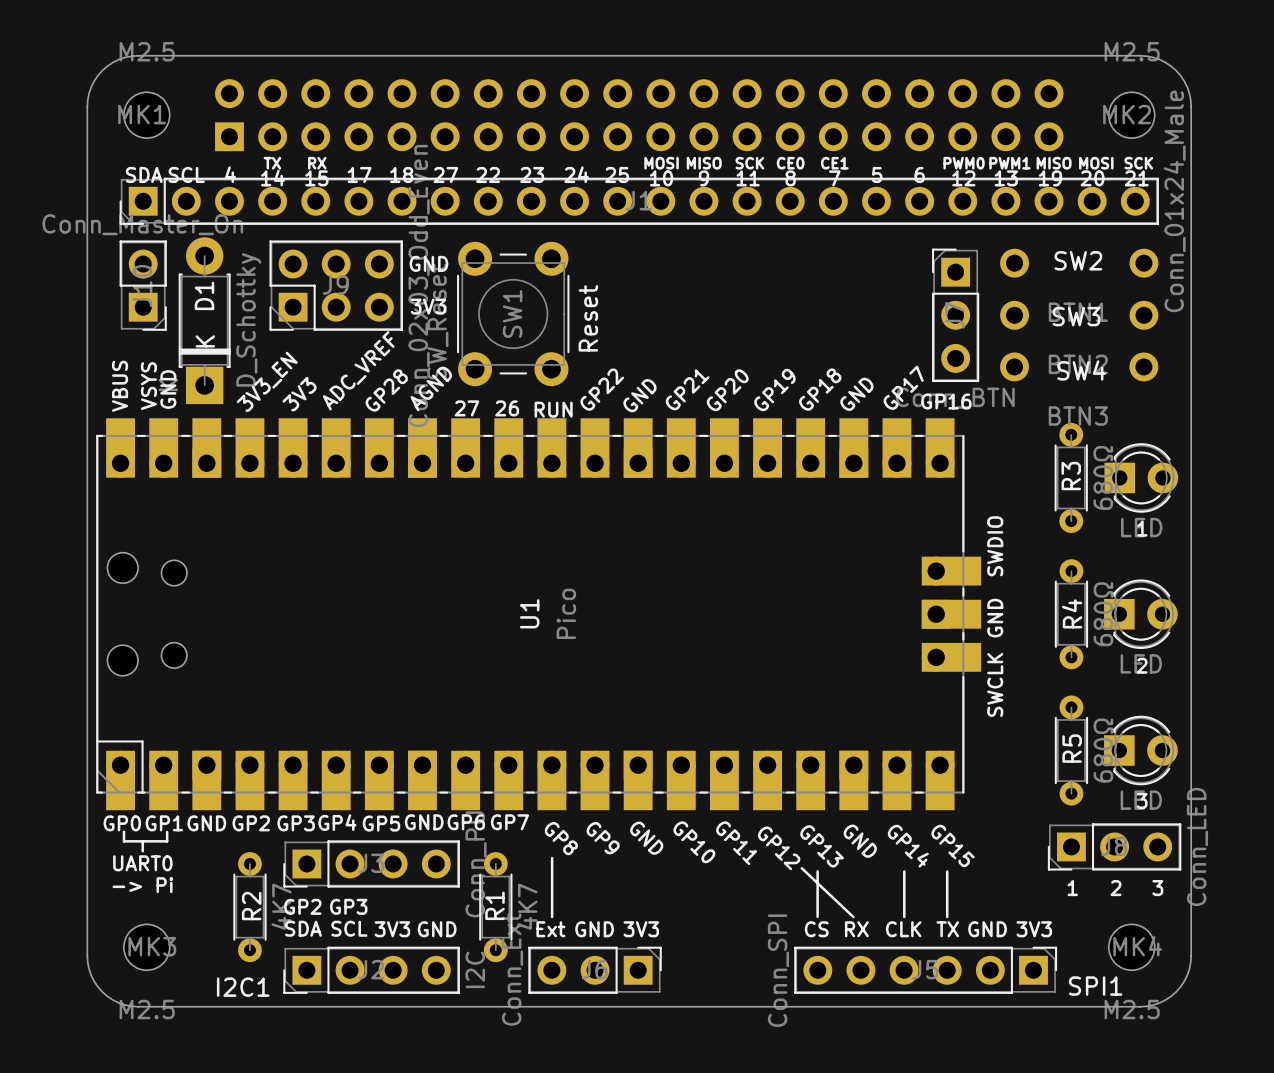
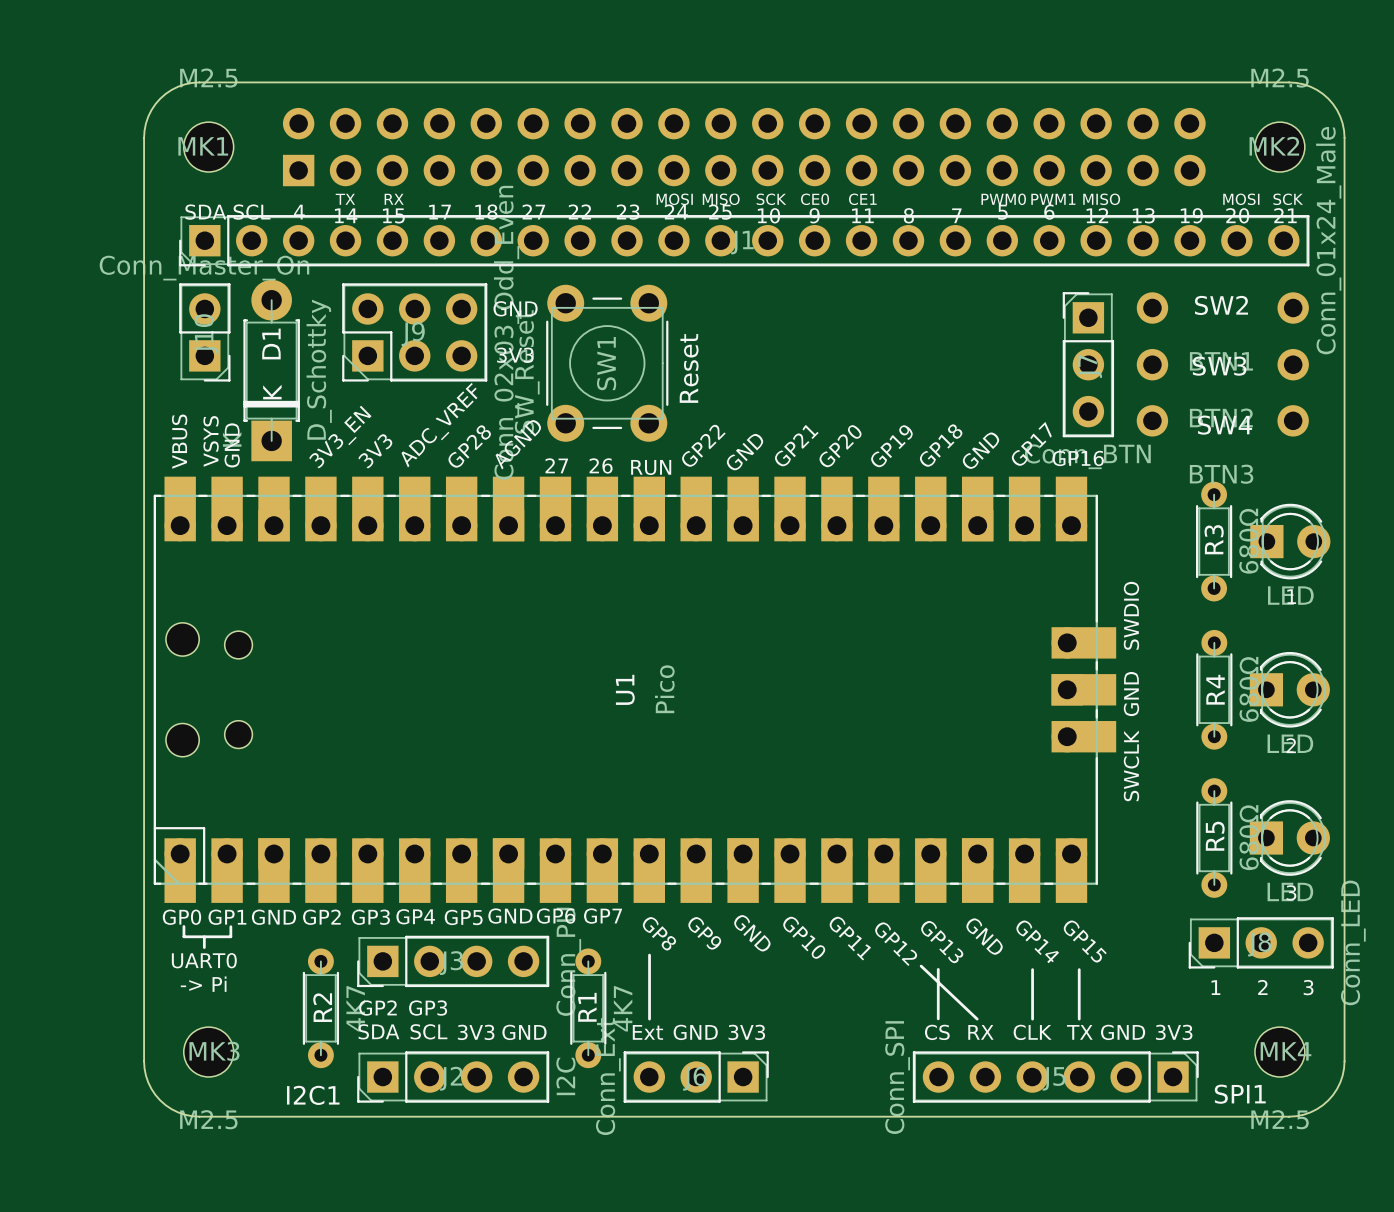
text: none -> MISO (721, 199)
text position: MOSI (661, 163) -> MOSI (674, 199)
text: none -> SCK (771, 199)
text: MISO (704, 163) -> CE0 (815, 199)
text: SCK (749, 163) -> CE1 (862, 199)
text: CE0 (790, 163) -> none
text: CE1 (834, 163) -> none
text position: PWM0 (964, 163) -> PWM0 (1003, 199)
text position: PWM1 (1009, 163) -> PWM1 (1053, 199)
text position: MISO (1054, 163) -> MISO (1101, 199)

